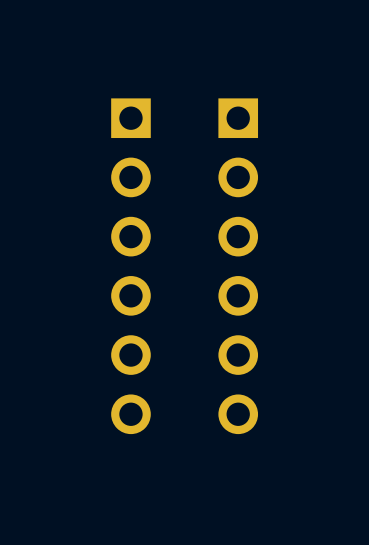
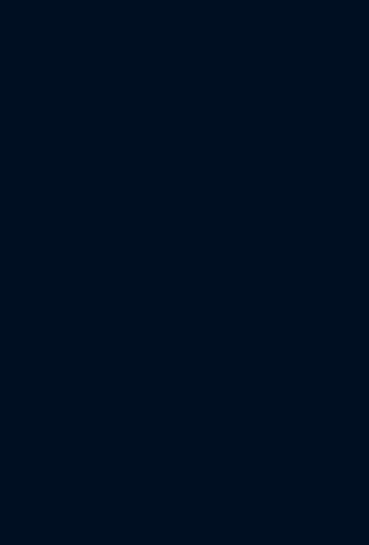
part: (130, 266) -> none
part: (238, 266) -> none

